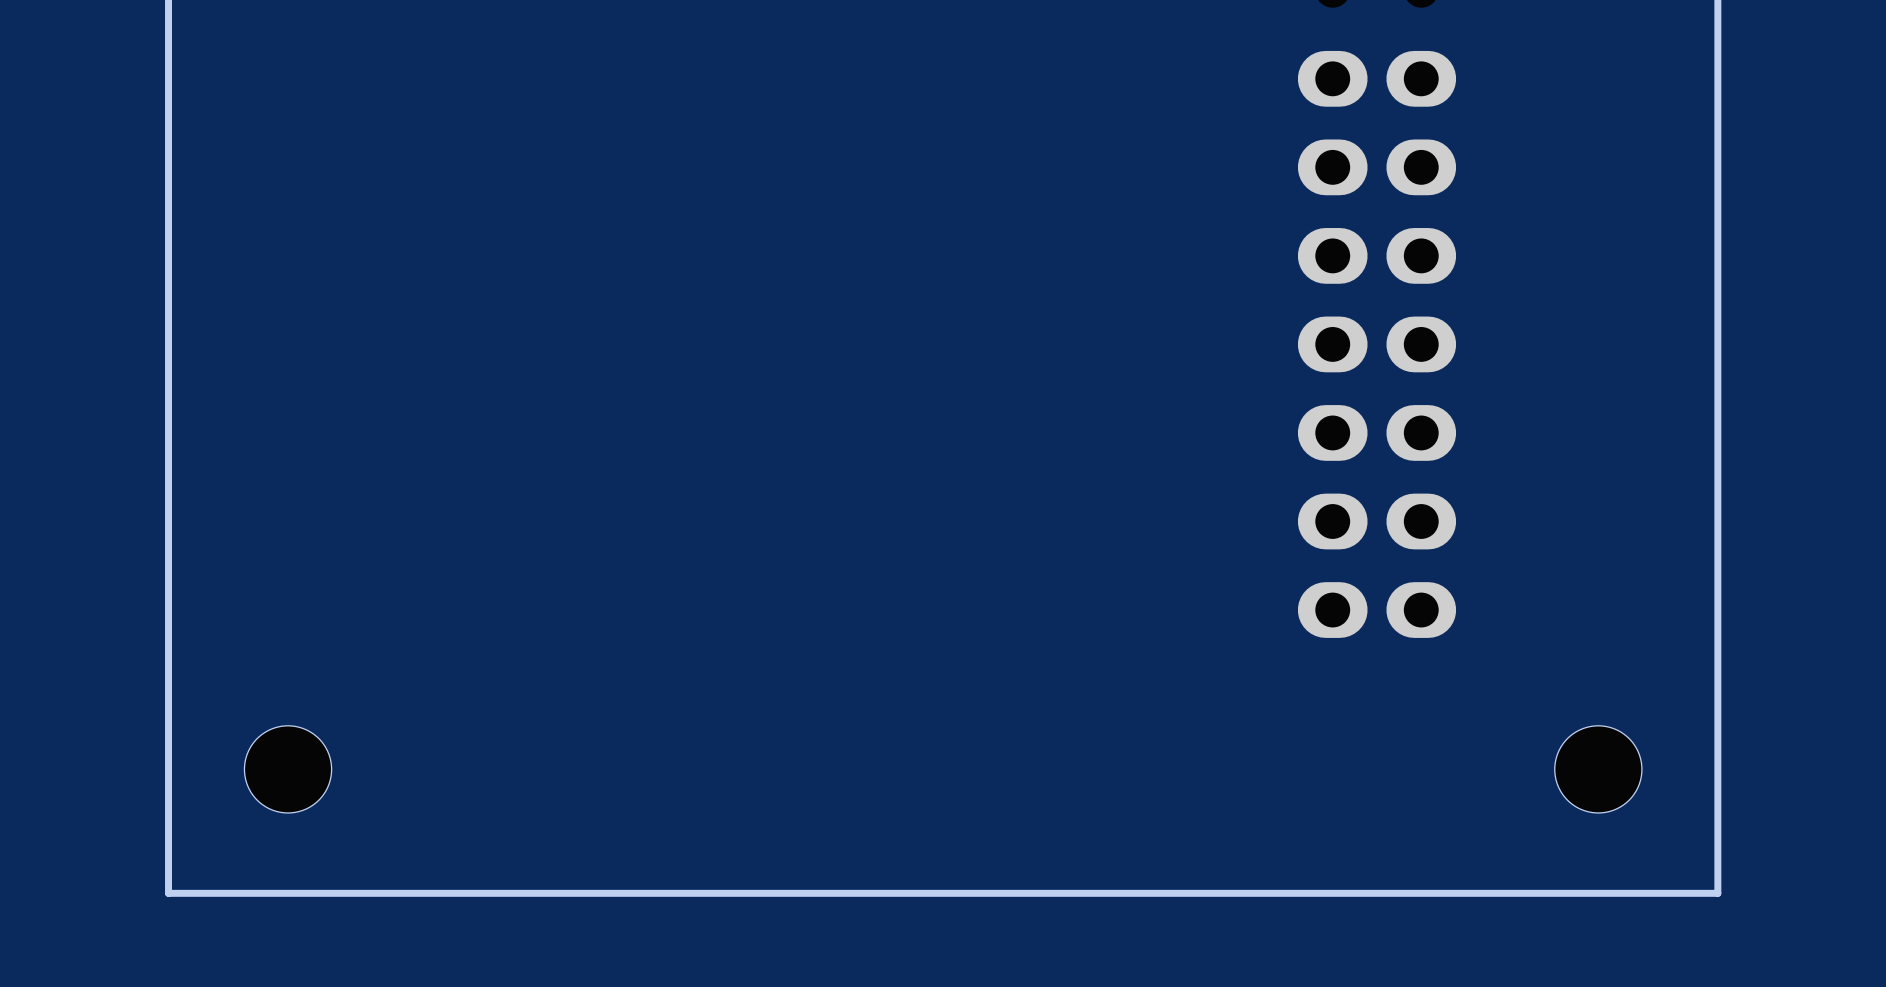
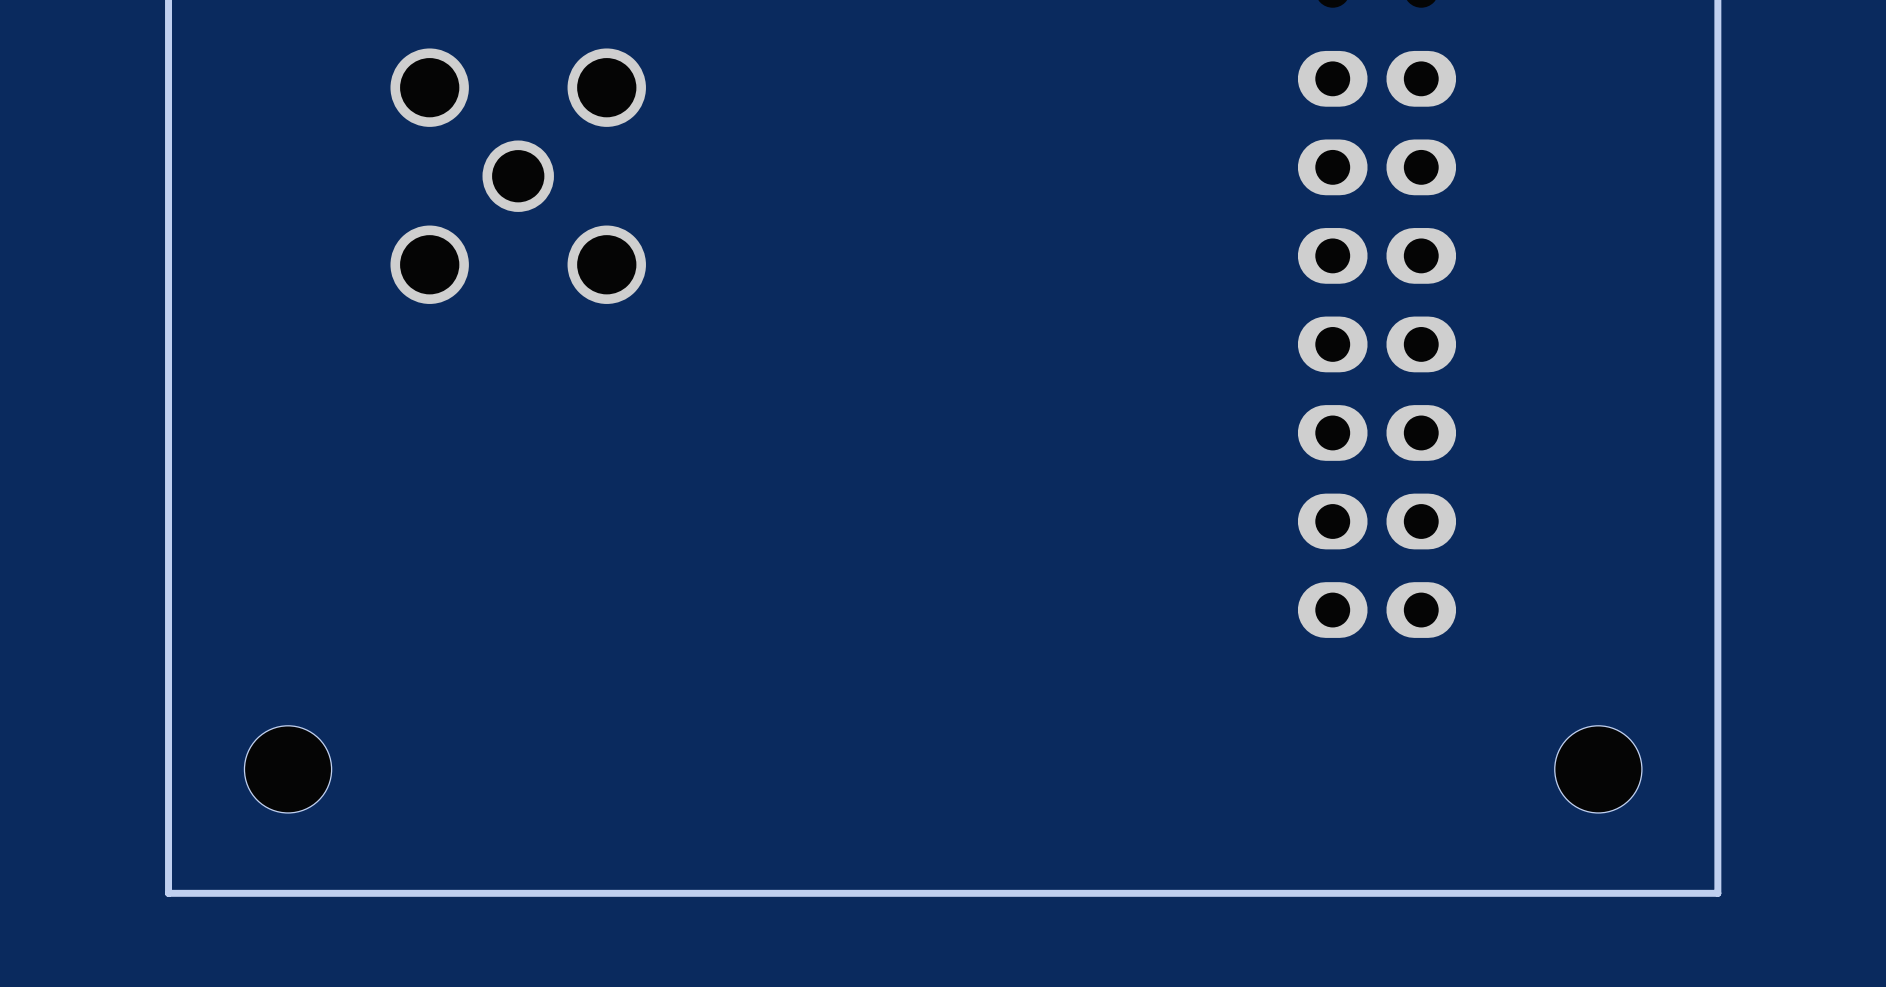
part: none -> (518, 176)

